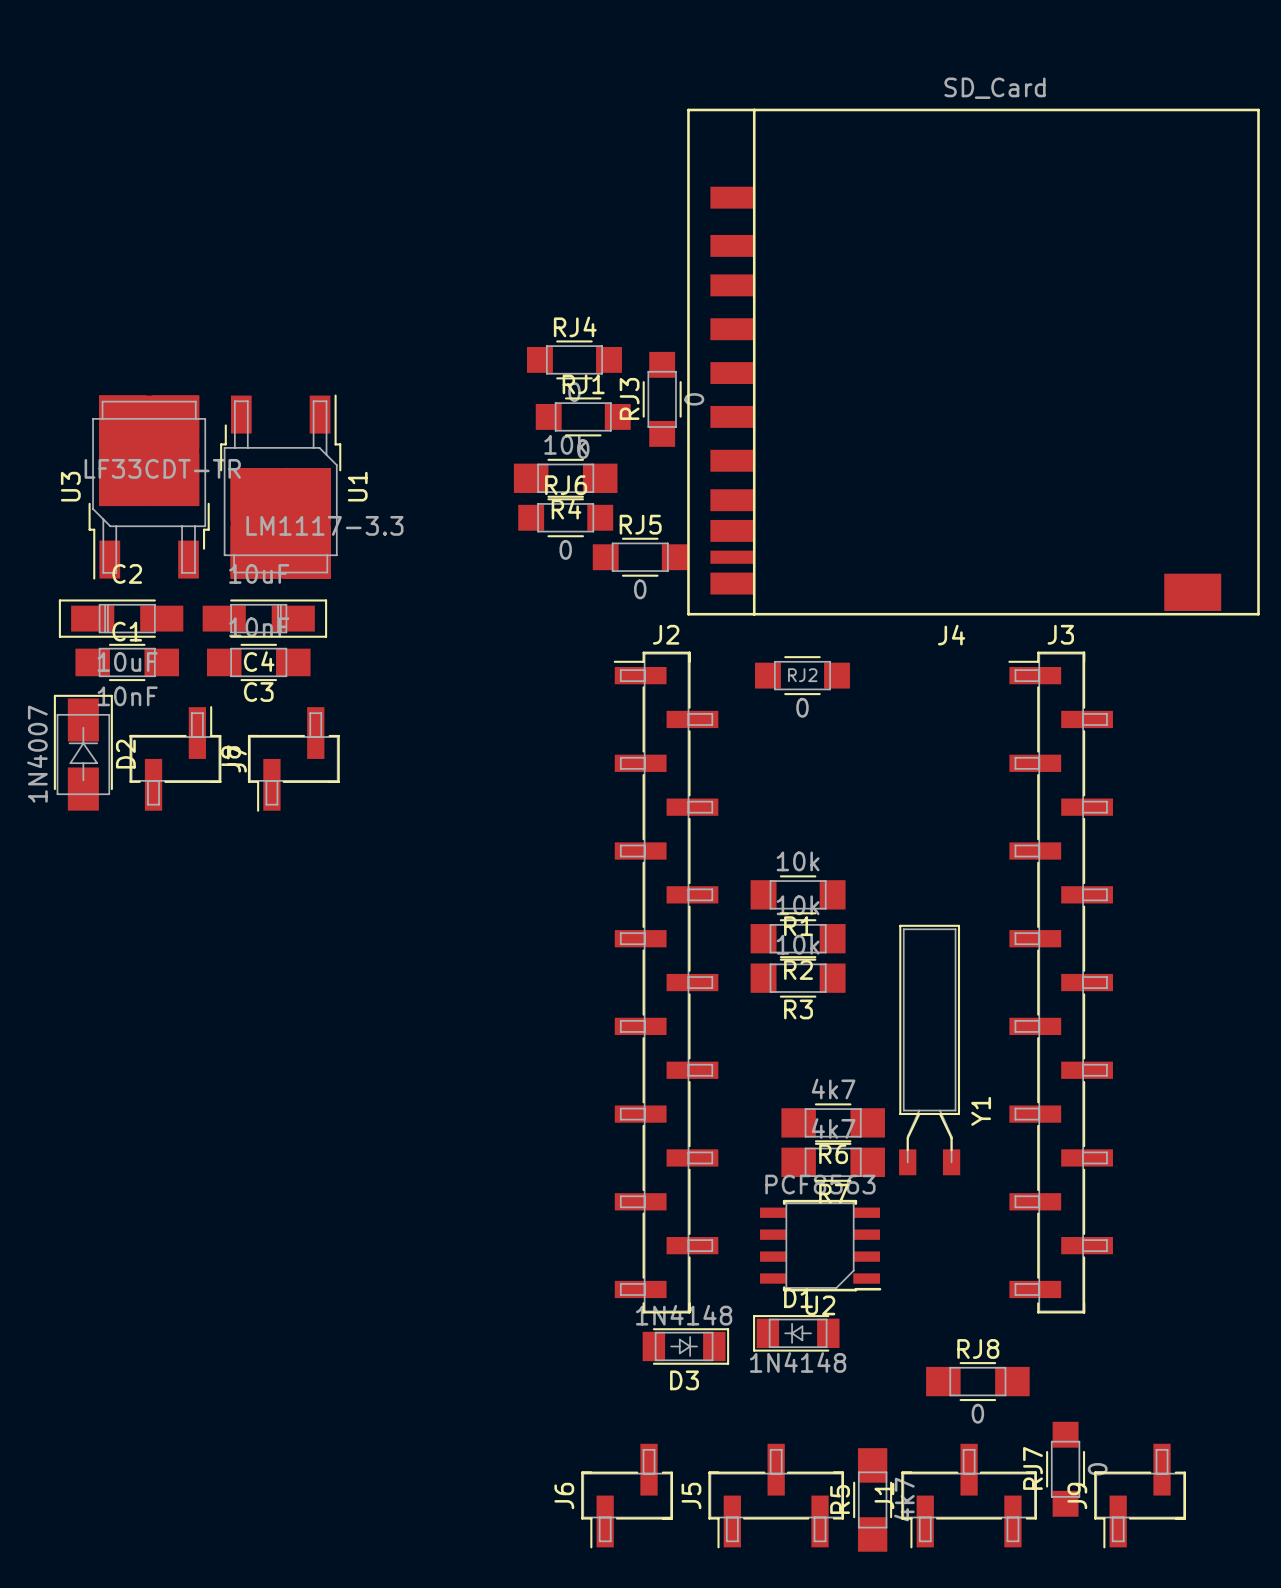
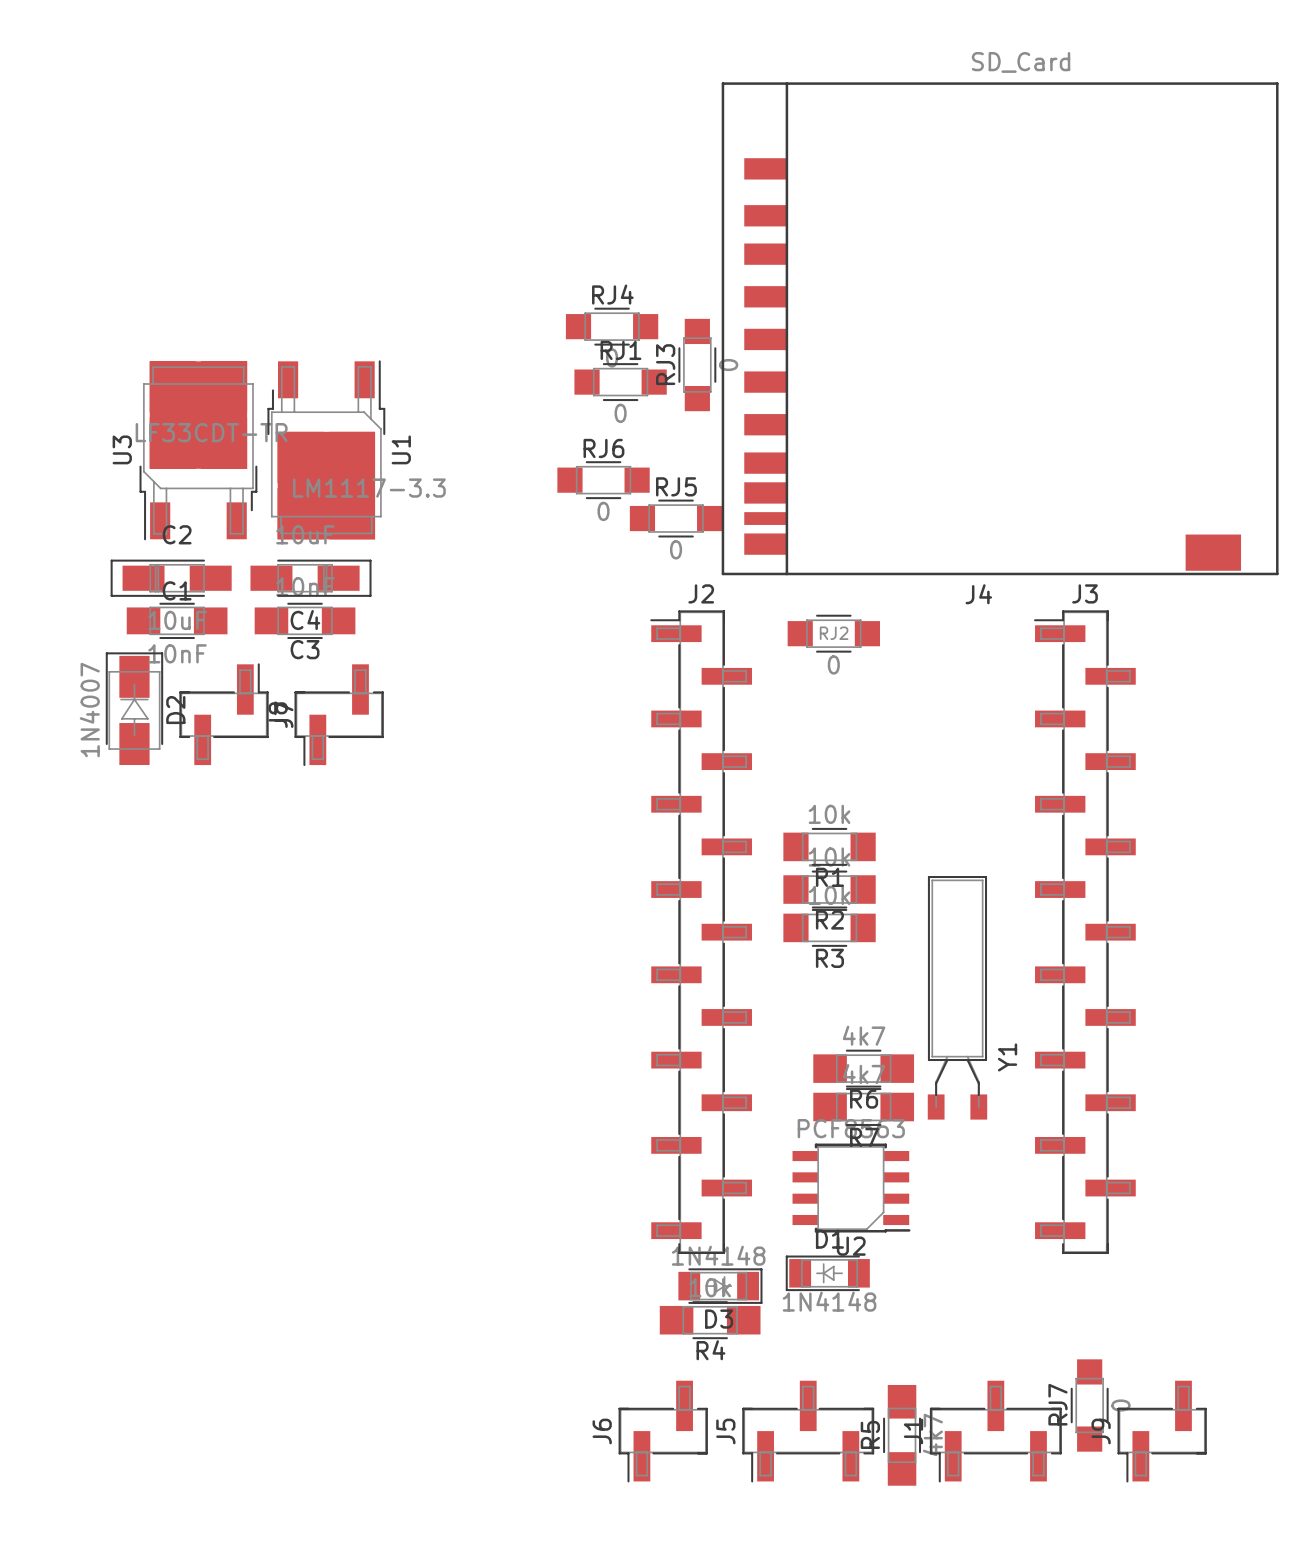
R4 position: (565, 478) -> (710, 1320)
RJ8: 0 (977, 1381) -> none

